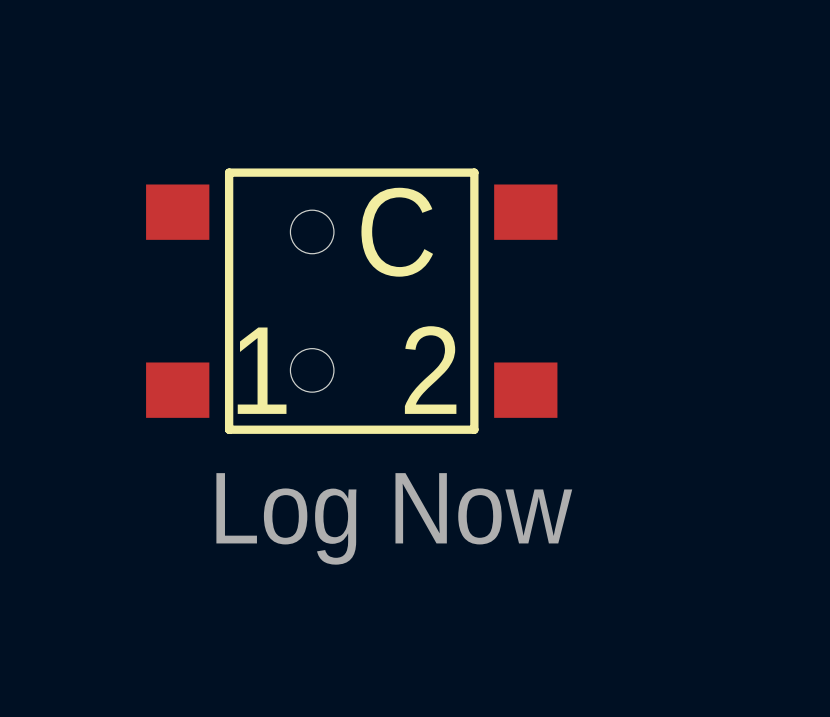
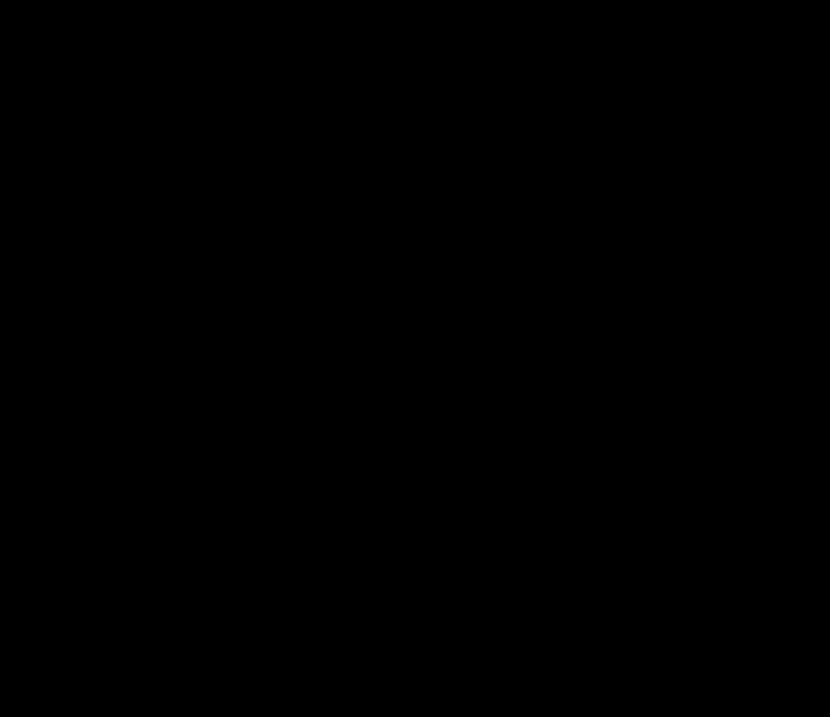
part: Log Now (351, 301) -> none

